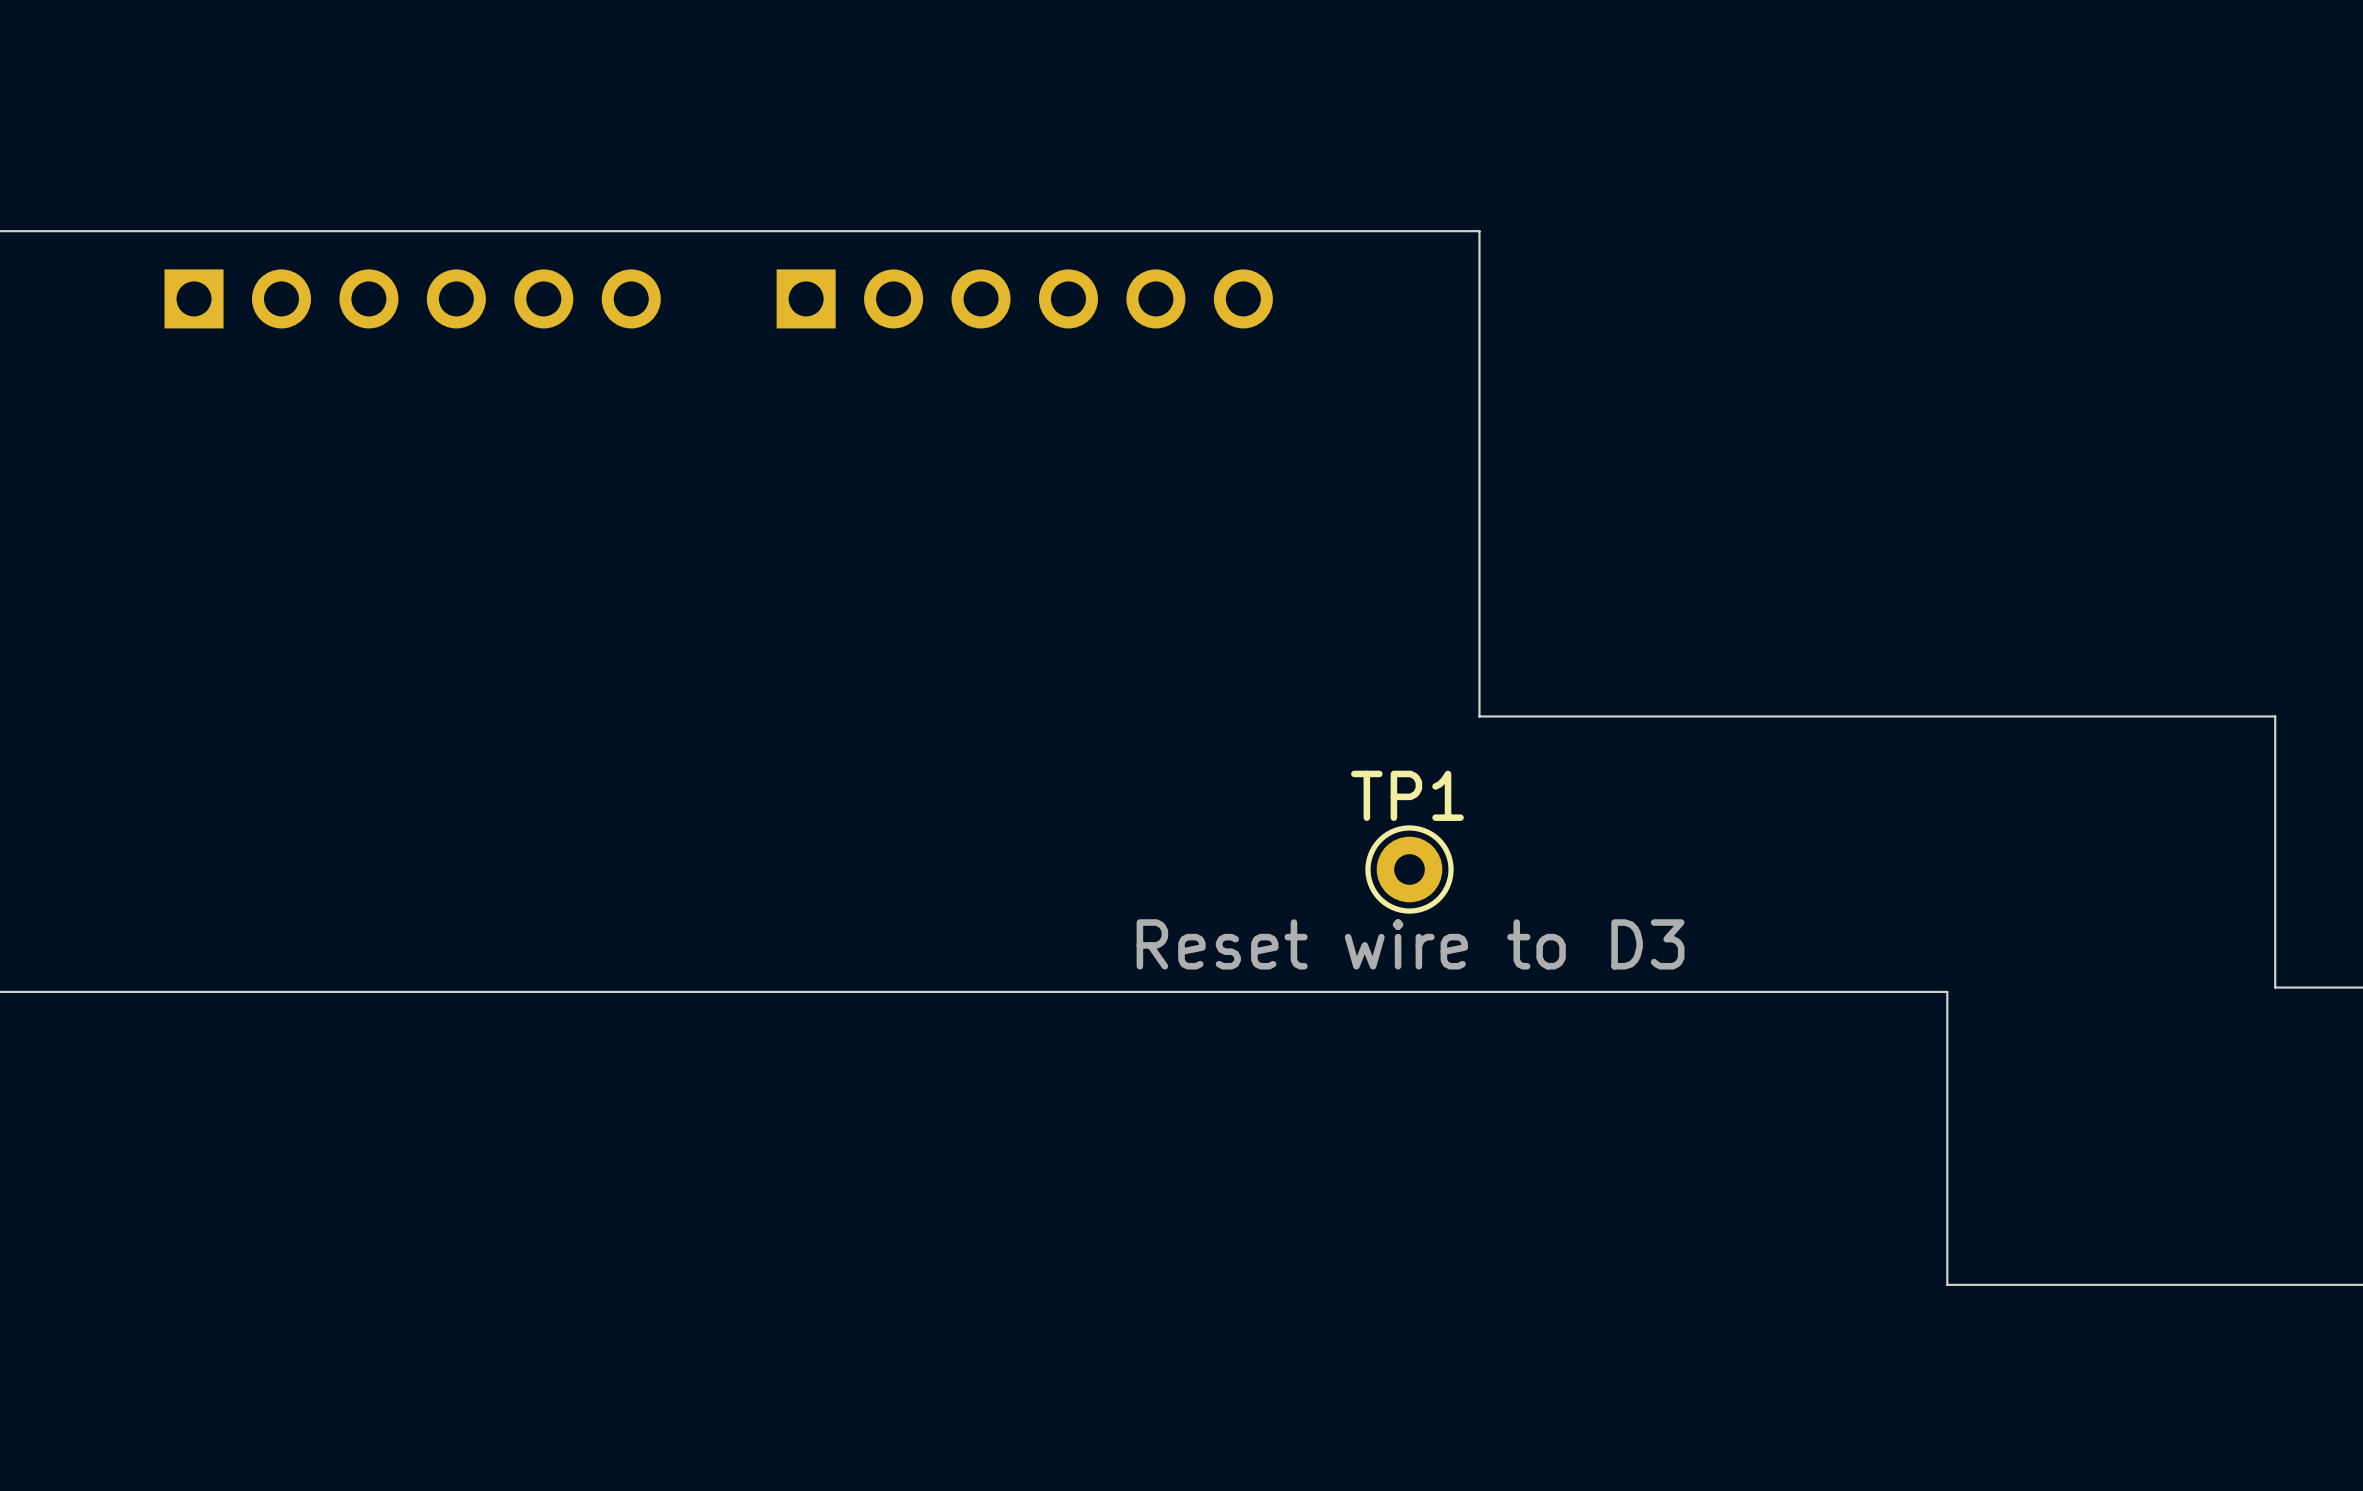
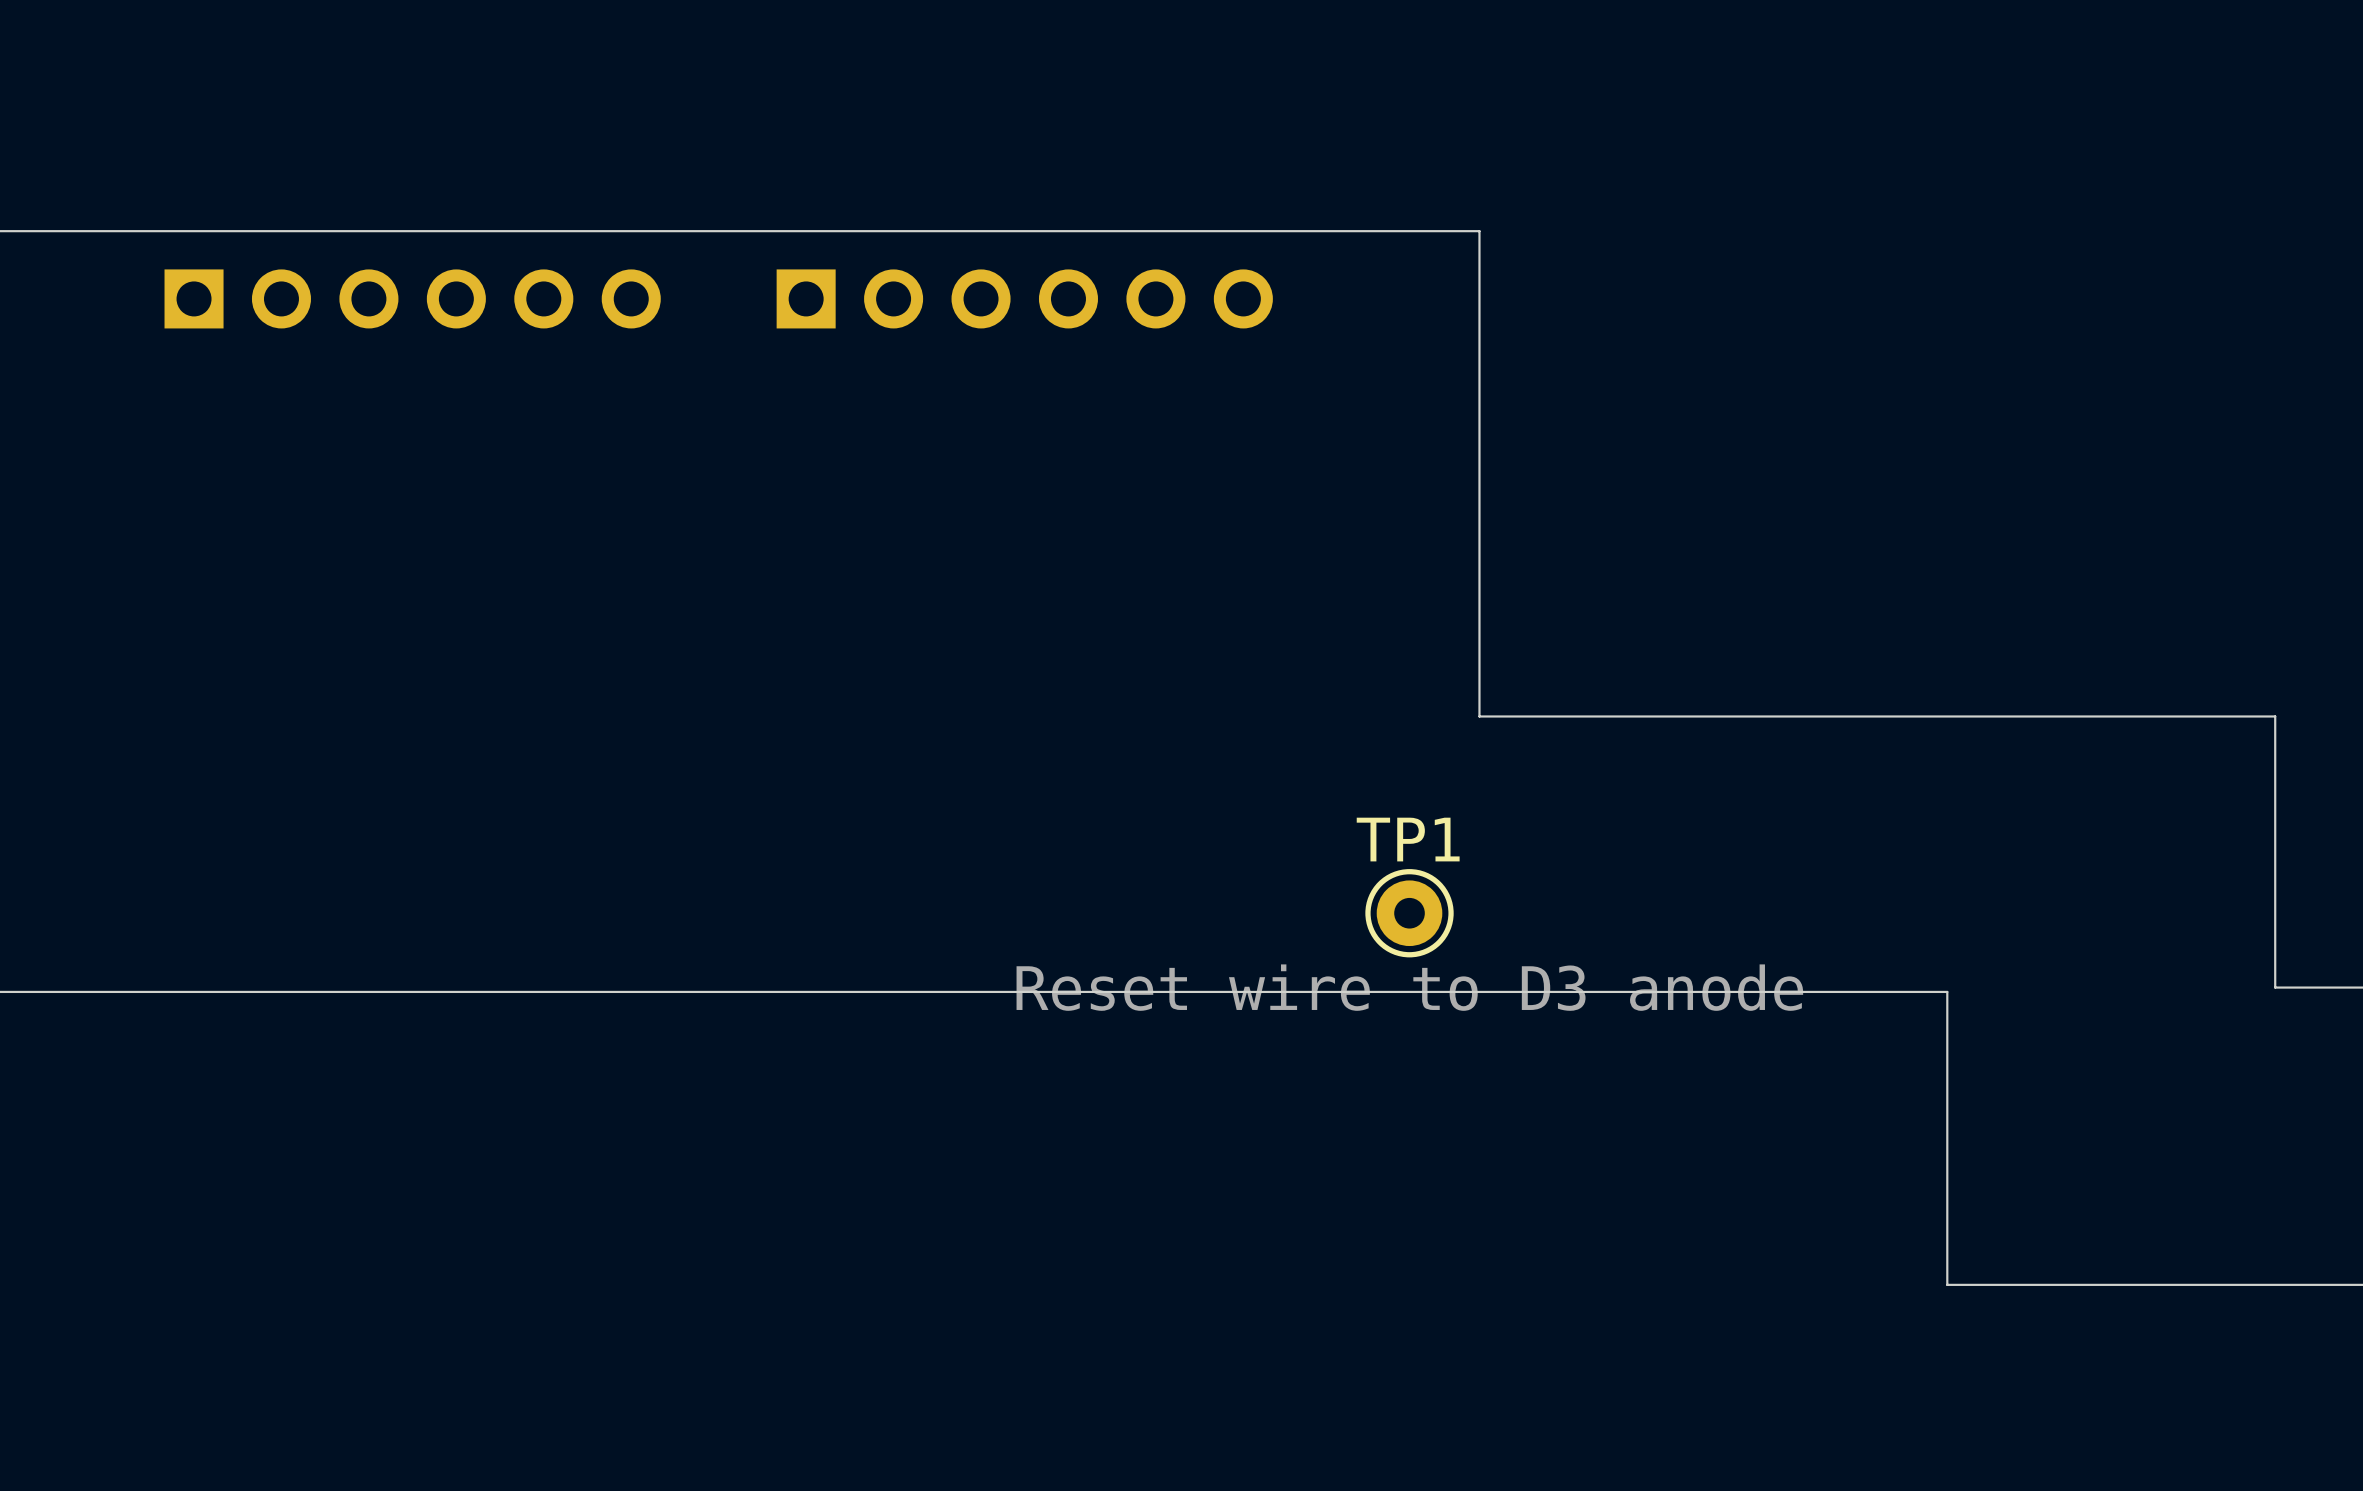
TP1 position: (1409, 869) -> (1409, 913)
TP1 value: Reset wire to D3 (1410, 944) -> Reset wire to D3 anode (1409, 987)

